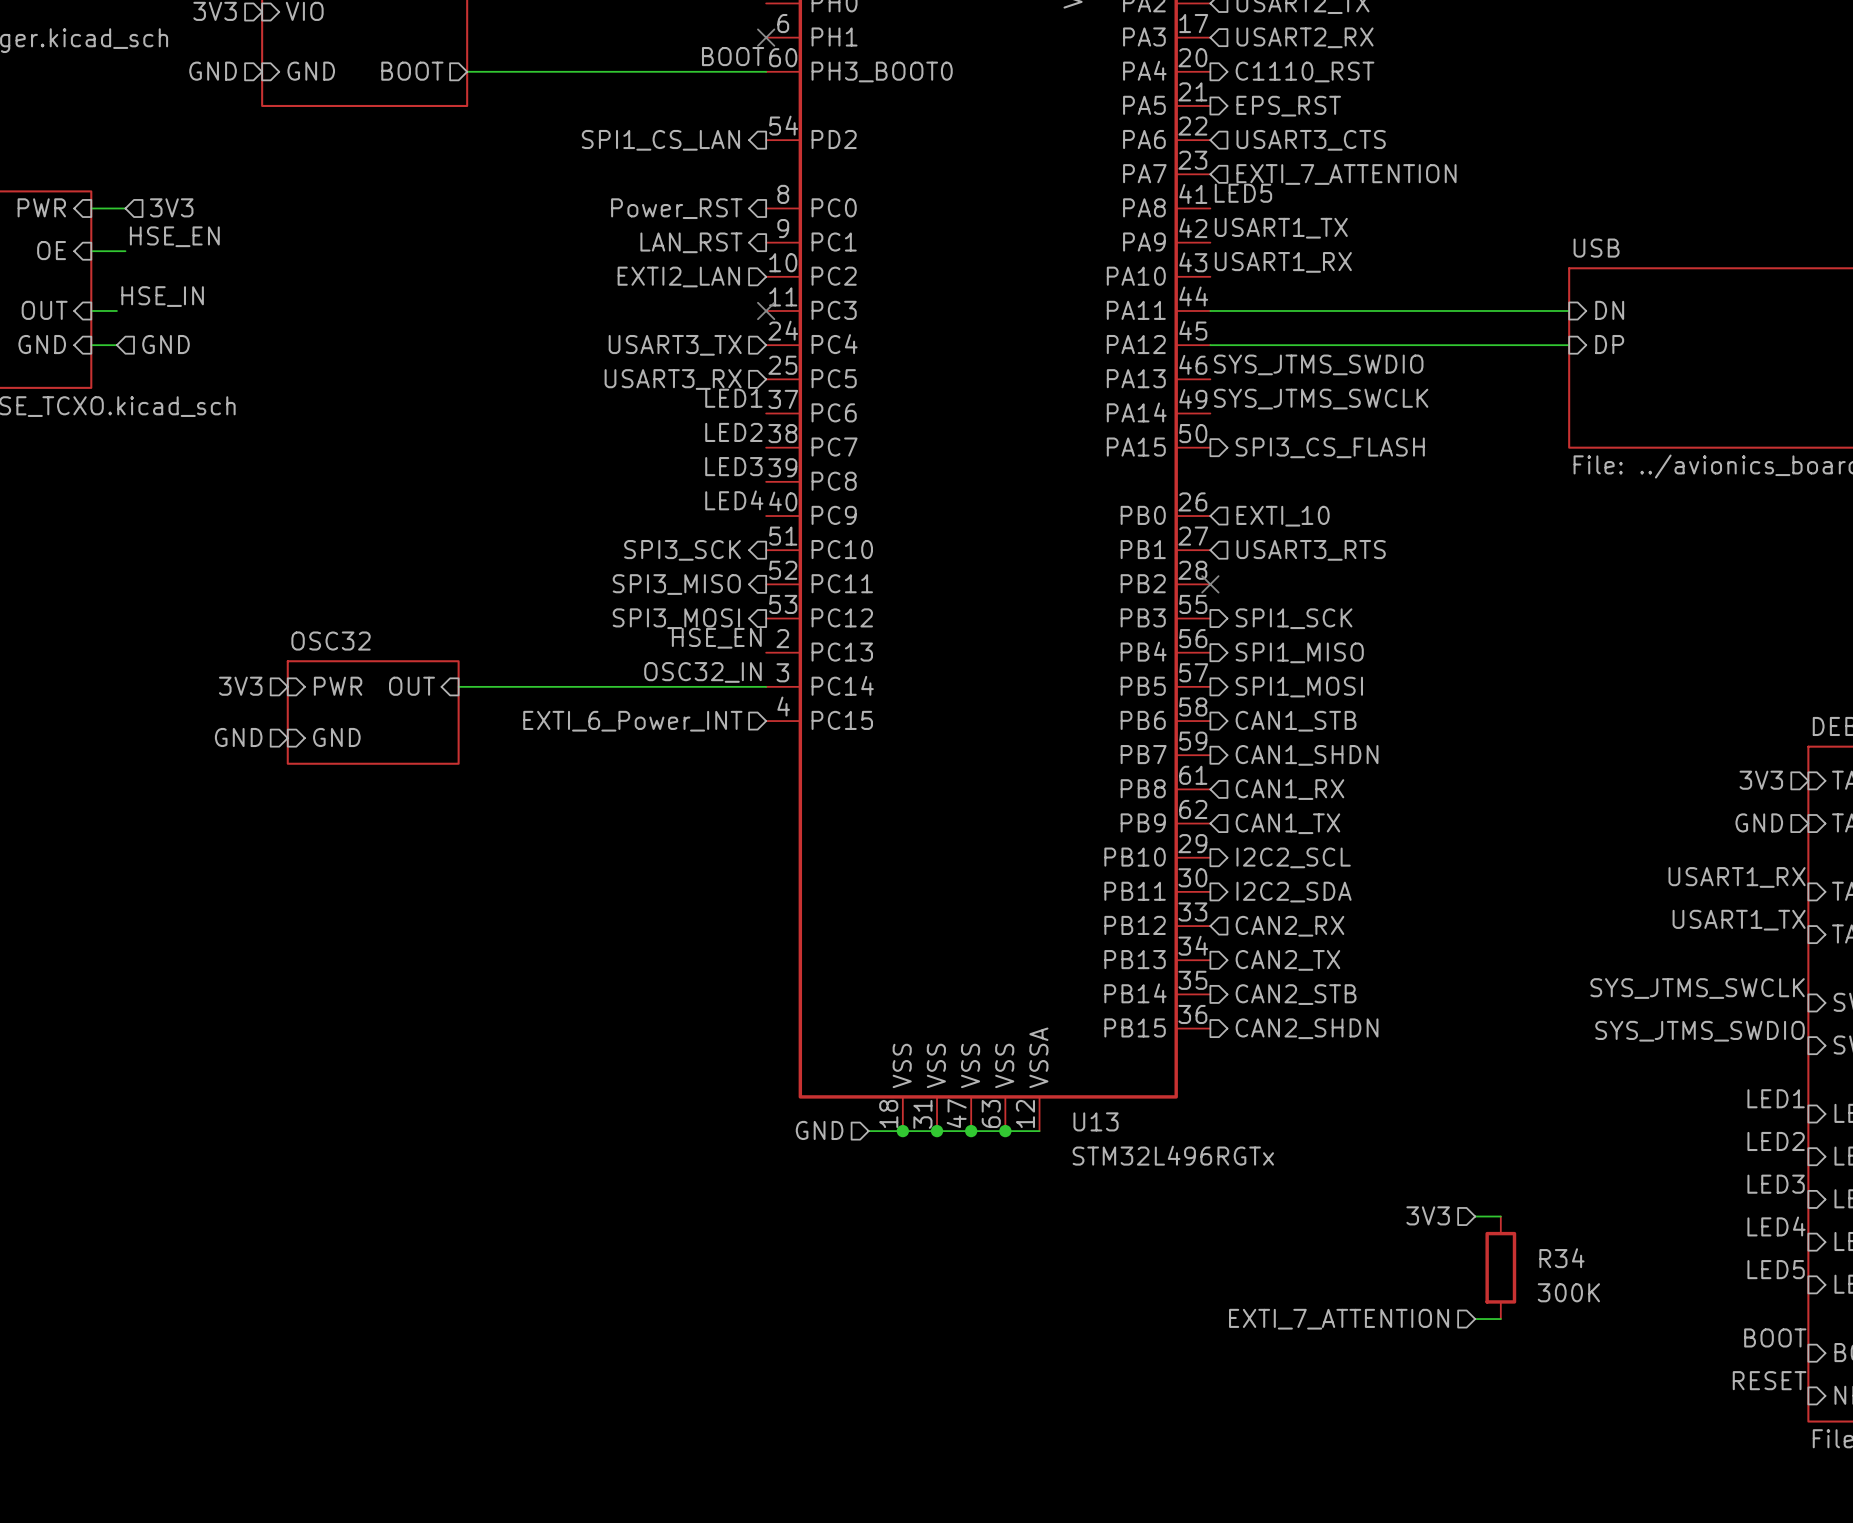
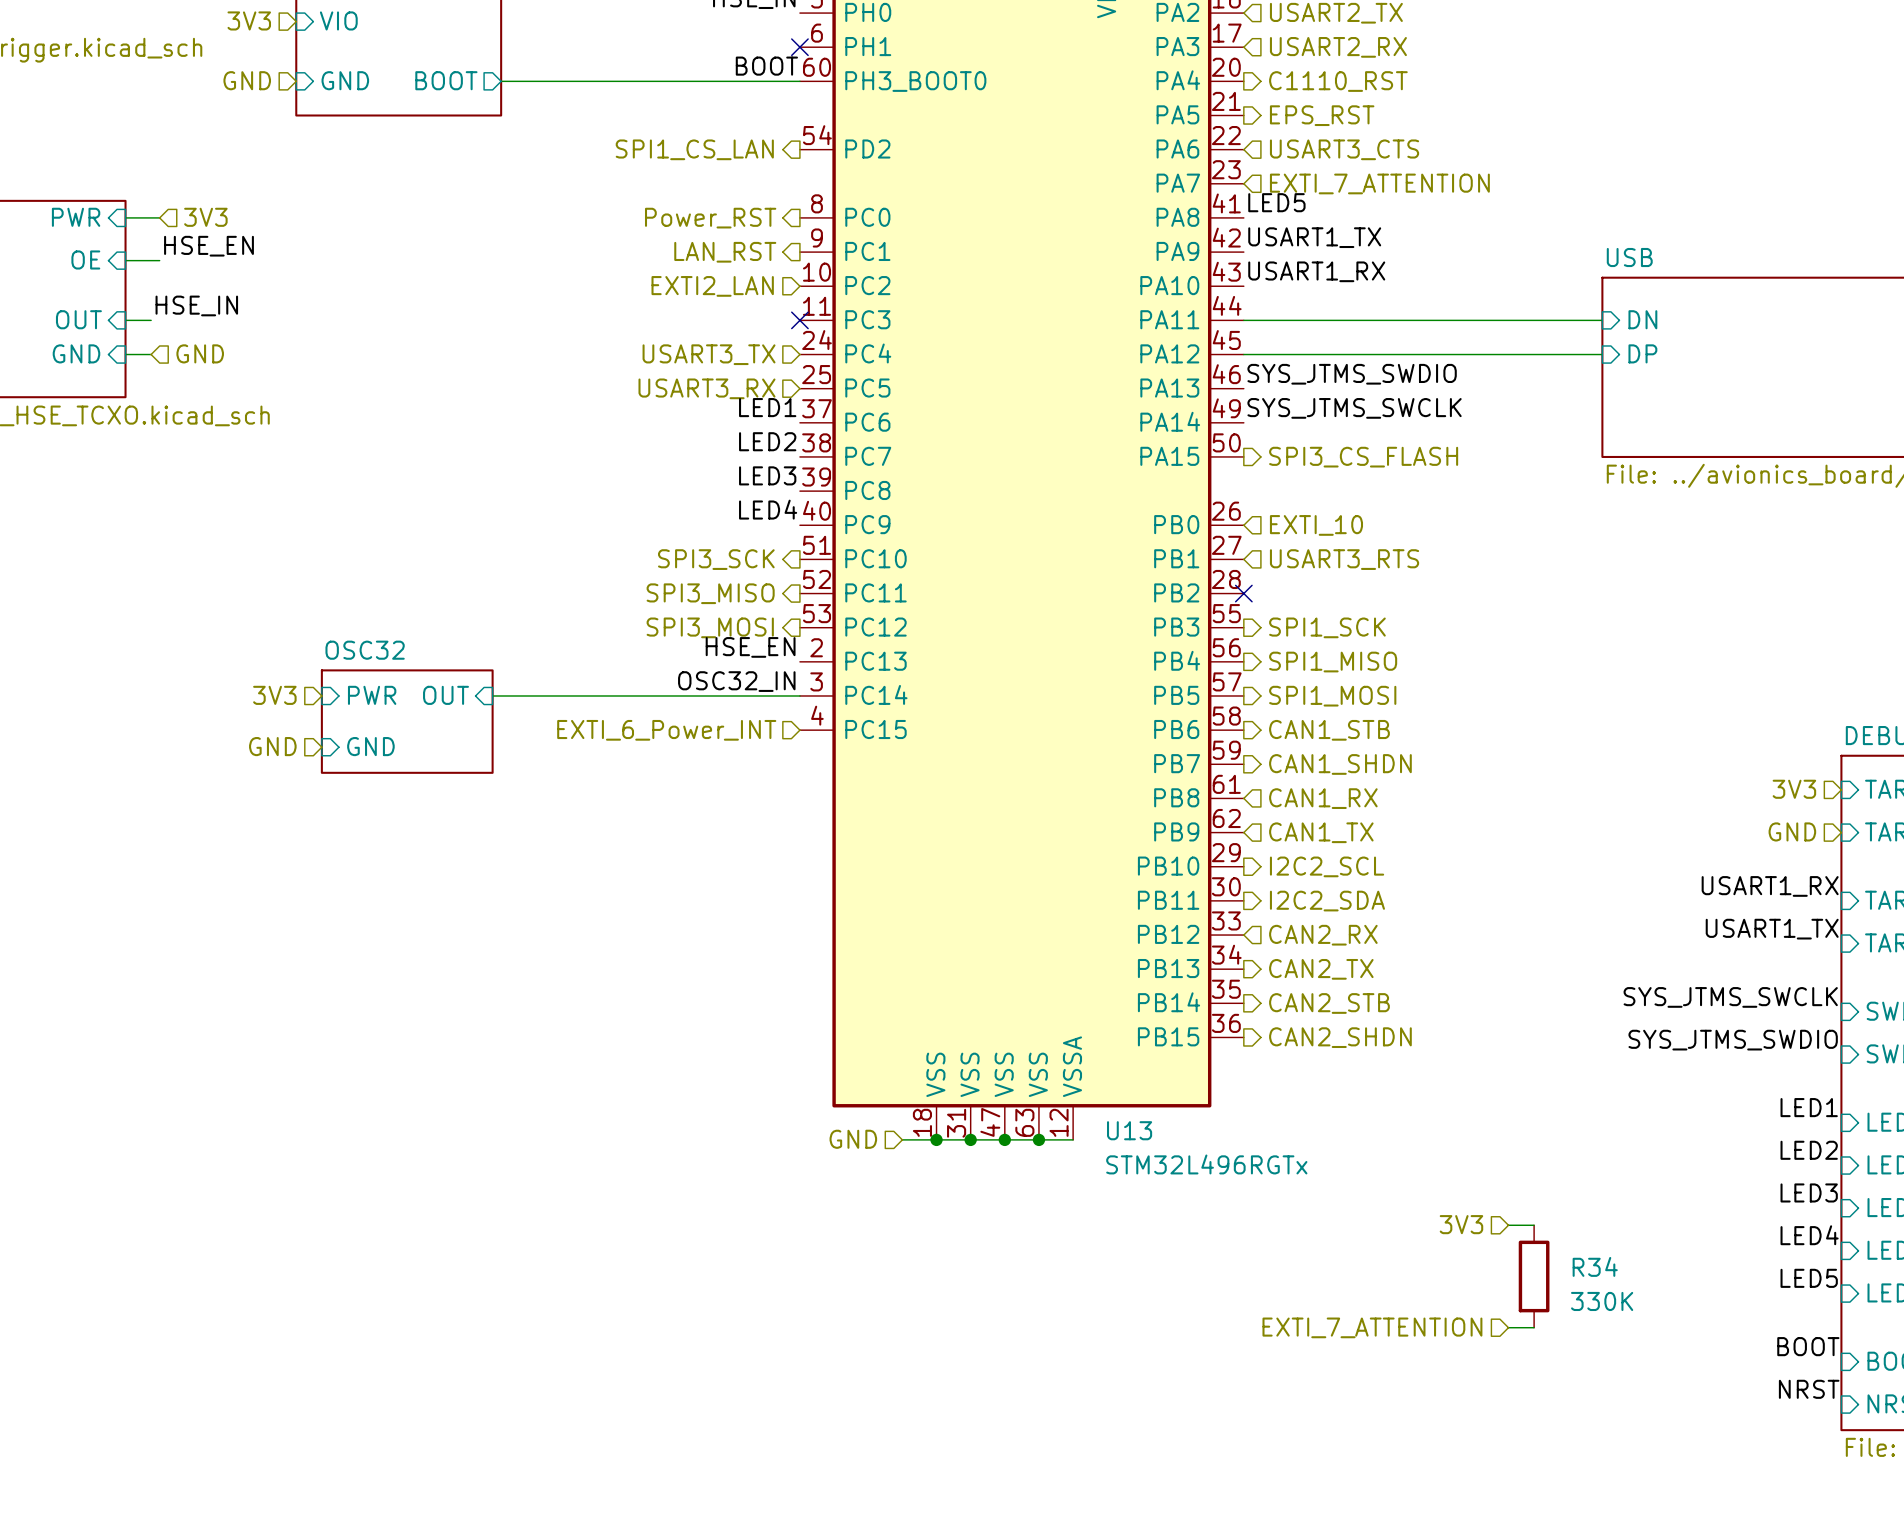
R34 value: 300K (1568, 1292) -> 330K (1602, 1301)
label: RESET (1769, 1380) -> NRST (1809, 1389)

